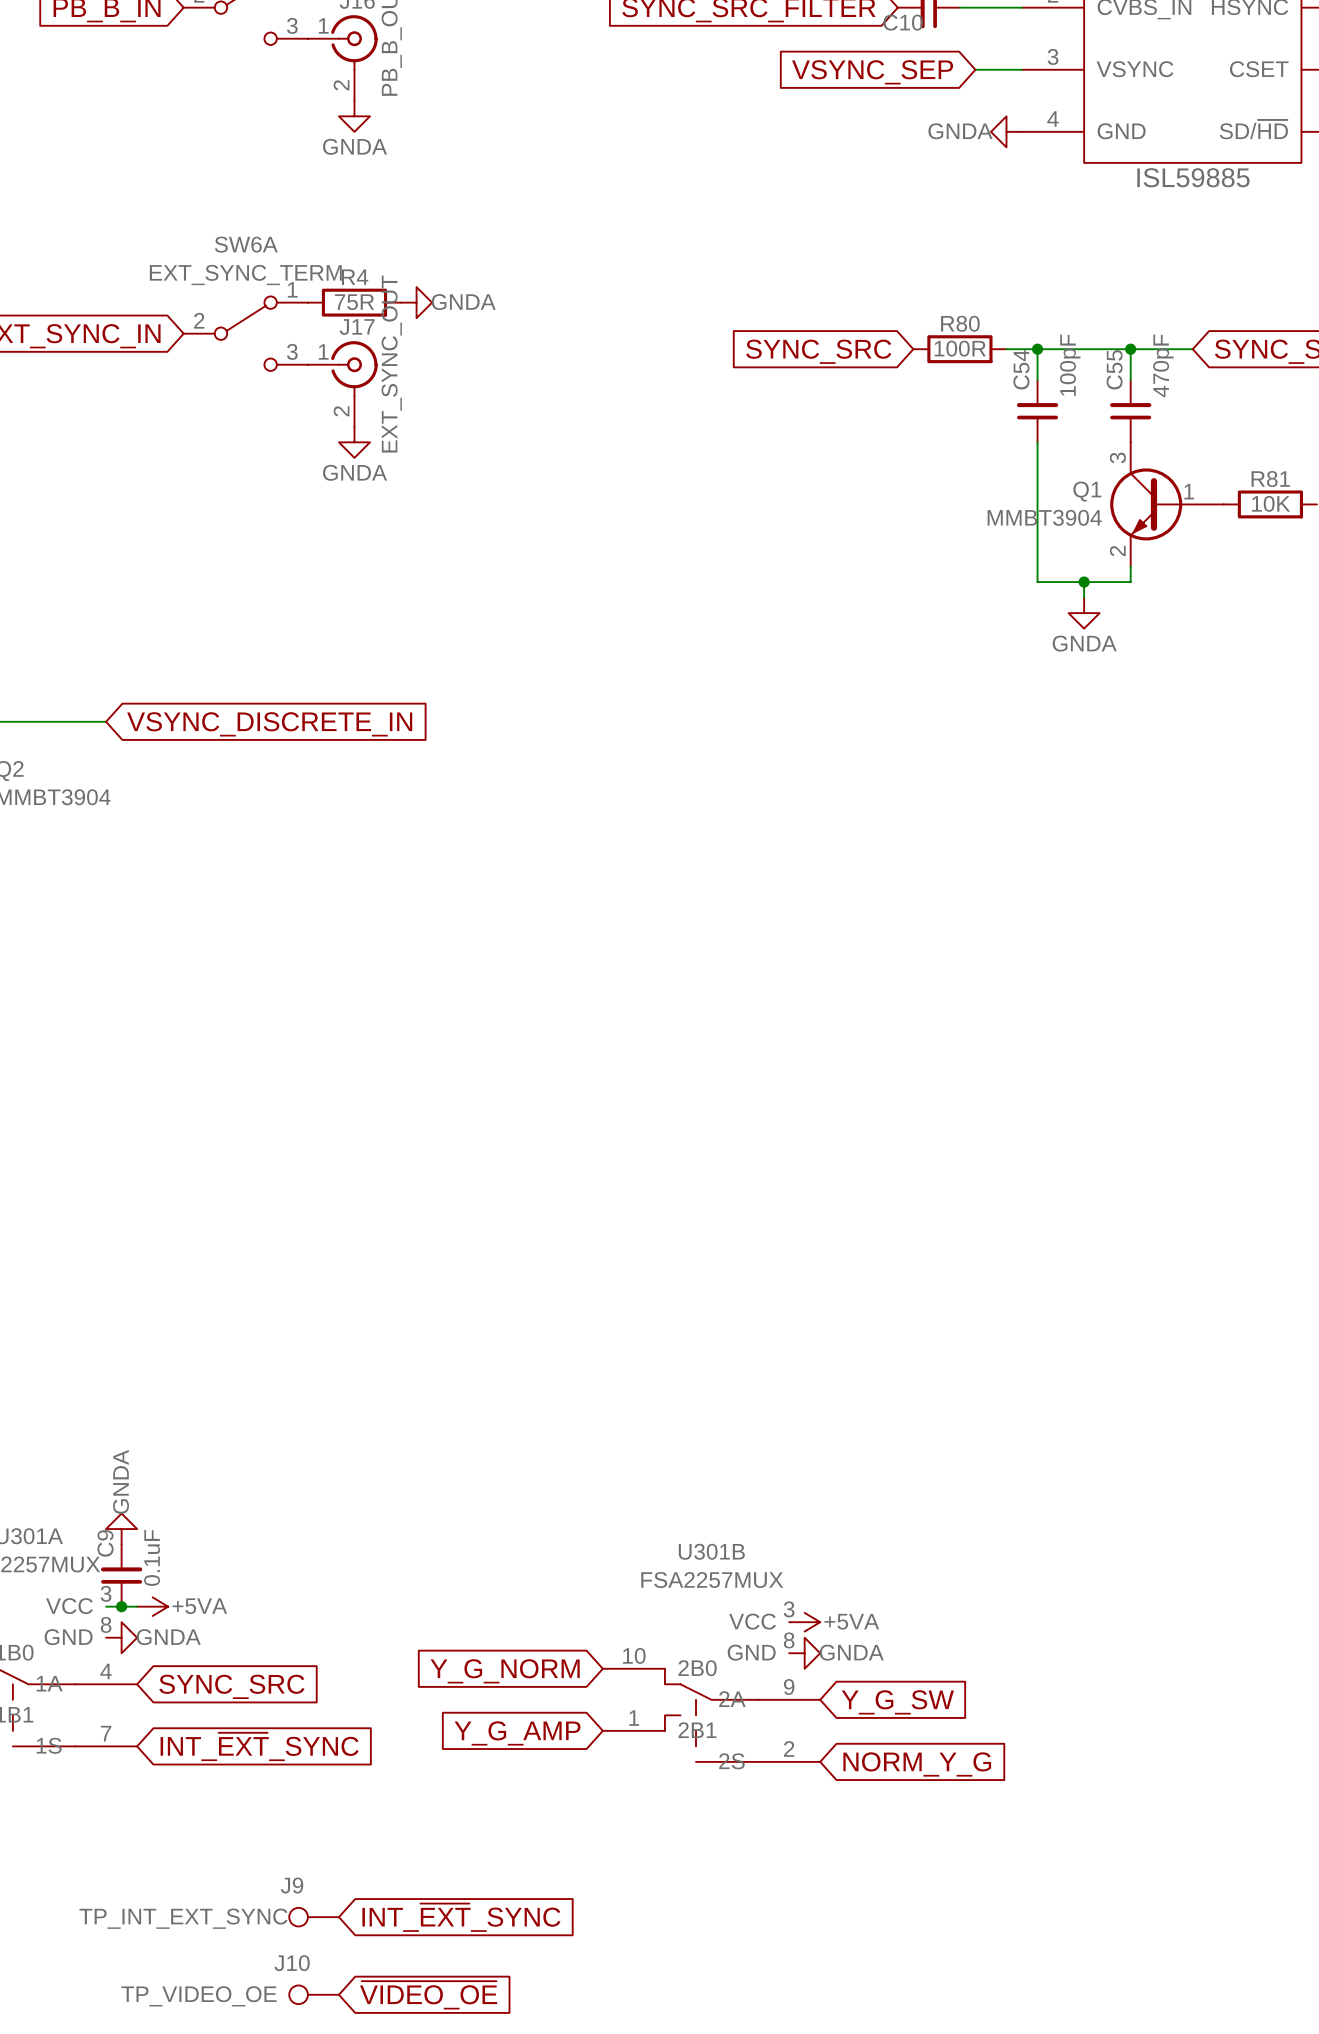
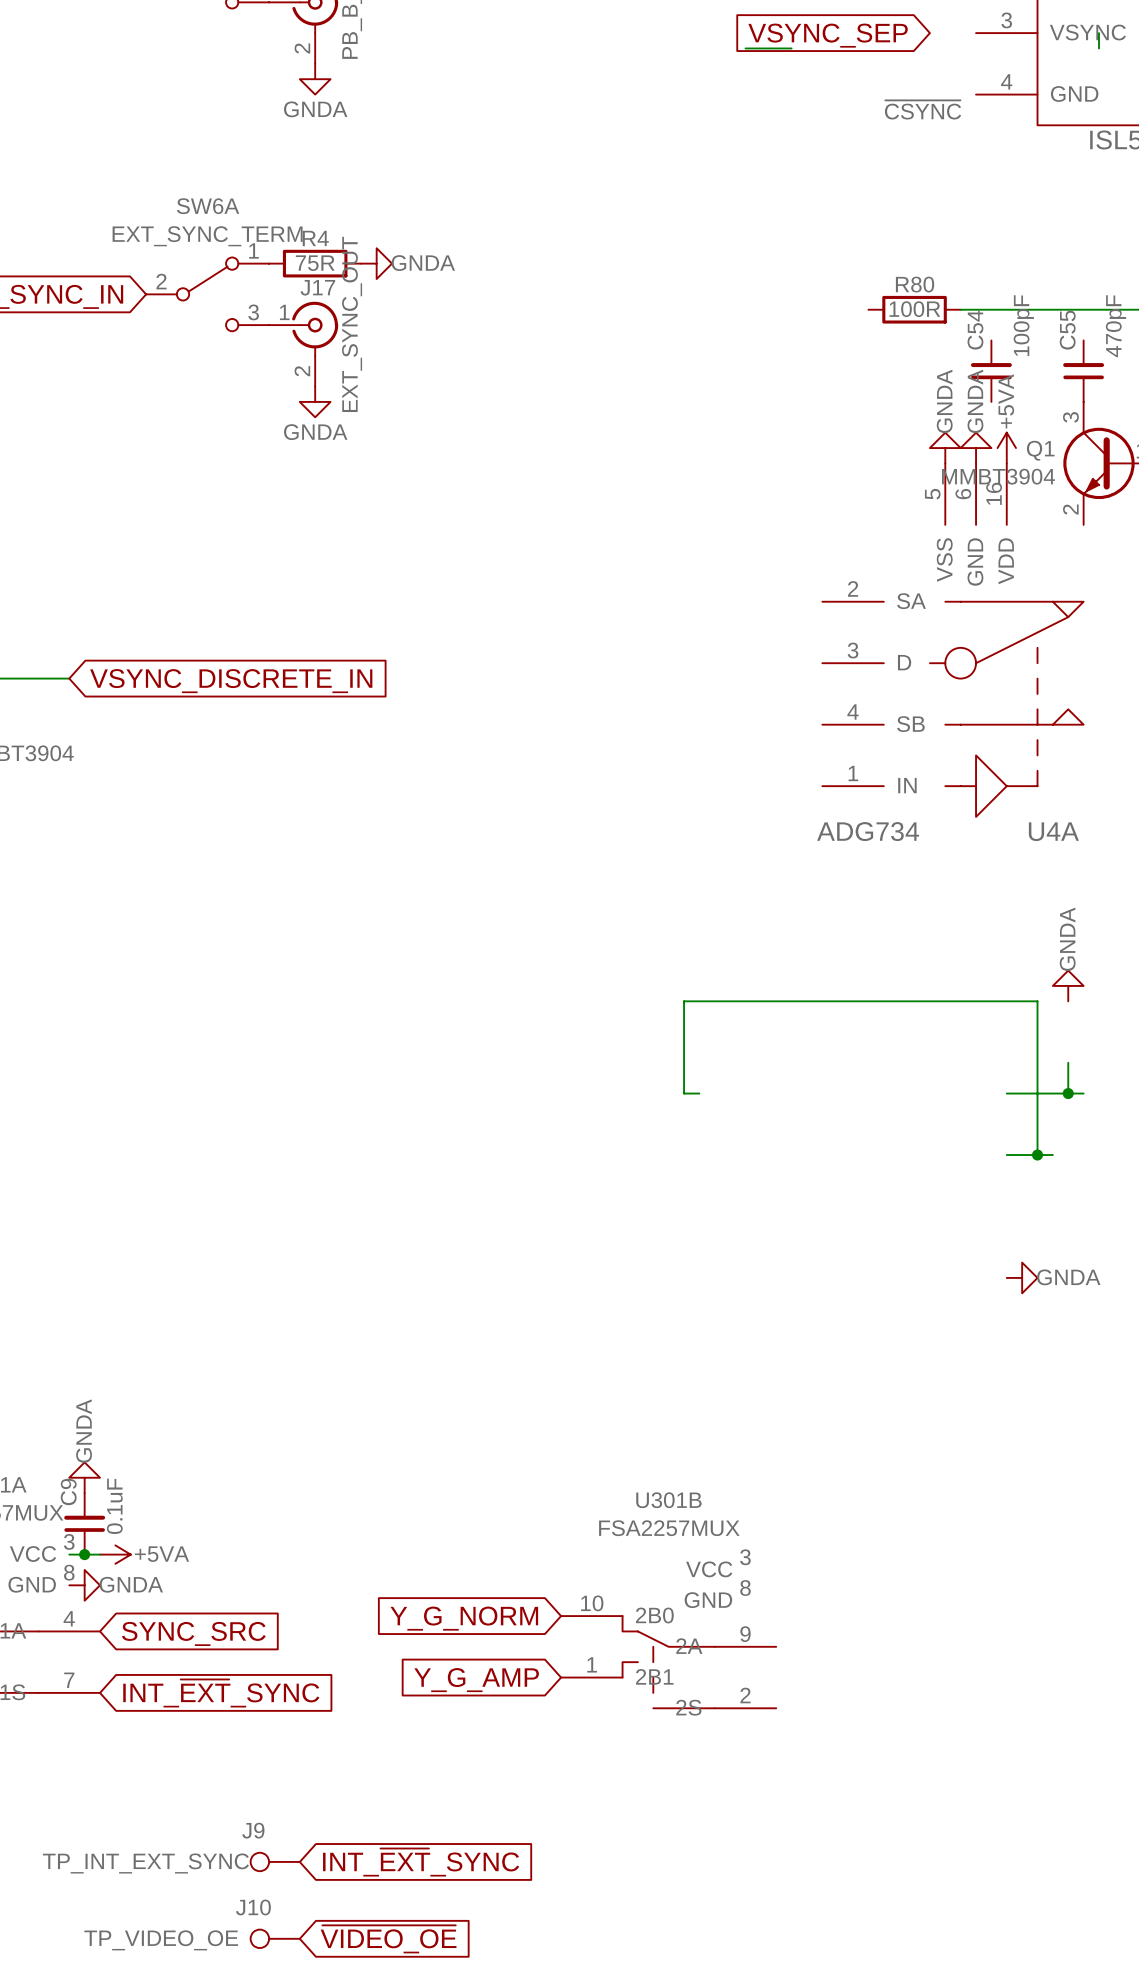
wire: (975, 69) (1022, 69) -> (745, 48) (791, 48)
wire: none -> (1098, 33) (1098, 48)
power symbol: GNDA (1006, 131) -> none
label: none -> ~{CSYNC} (923, 109)
wire: (1037, 349) (1037, 380) -> none
junction: (1037, 349) -> none
wire: (1130, 349) (1130, 380) -> none
junction: (1130, 349) -> none
global label: SYNC_SRC (818, 351) -> none
wire: (1037, 442) (1037, 582) (1130, 582) (1130, 566) -> none
power symbol: none -> GNDA (945, 448)
power symbol: none -> GNDA (976, 448)
power symbol: none -> +5VA (1006, 448)
wire: (1084, 582) (1084, 597) -> none
junction: (1084, 582) -> none
power symbol: GNDA (1084, 613) -> none
U4A: none -> ADG734 (952, 640)
power symbol: none -> GNDA (1068, 985)
wire: none -> (1068, 1062) (1068, 1093)
wire: none -> (699, 1093) (684, 1093) (684, 1001) (1037, 1001) (1037, 1155)
wire: none -> (1006, 1093) (1083, 1093)
junction: none -> (1068, 1093)
wire: none -> (1006, 1155) (1052, 1155)
junction: none -> (1037, 1155)
power symbol: none -> GNDA (1022, 1277)
power symbol: +5VA (804, 1622) -> none
power symbol: GNDA (804, 1653) -> none
global label: Y_G_SW (897, 1702) -> none
global label: NORM_Y_G (917, 1764) -> none

